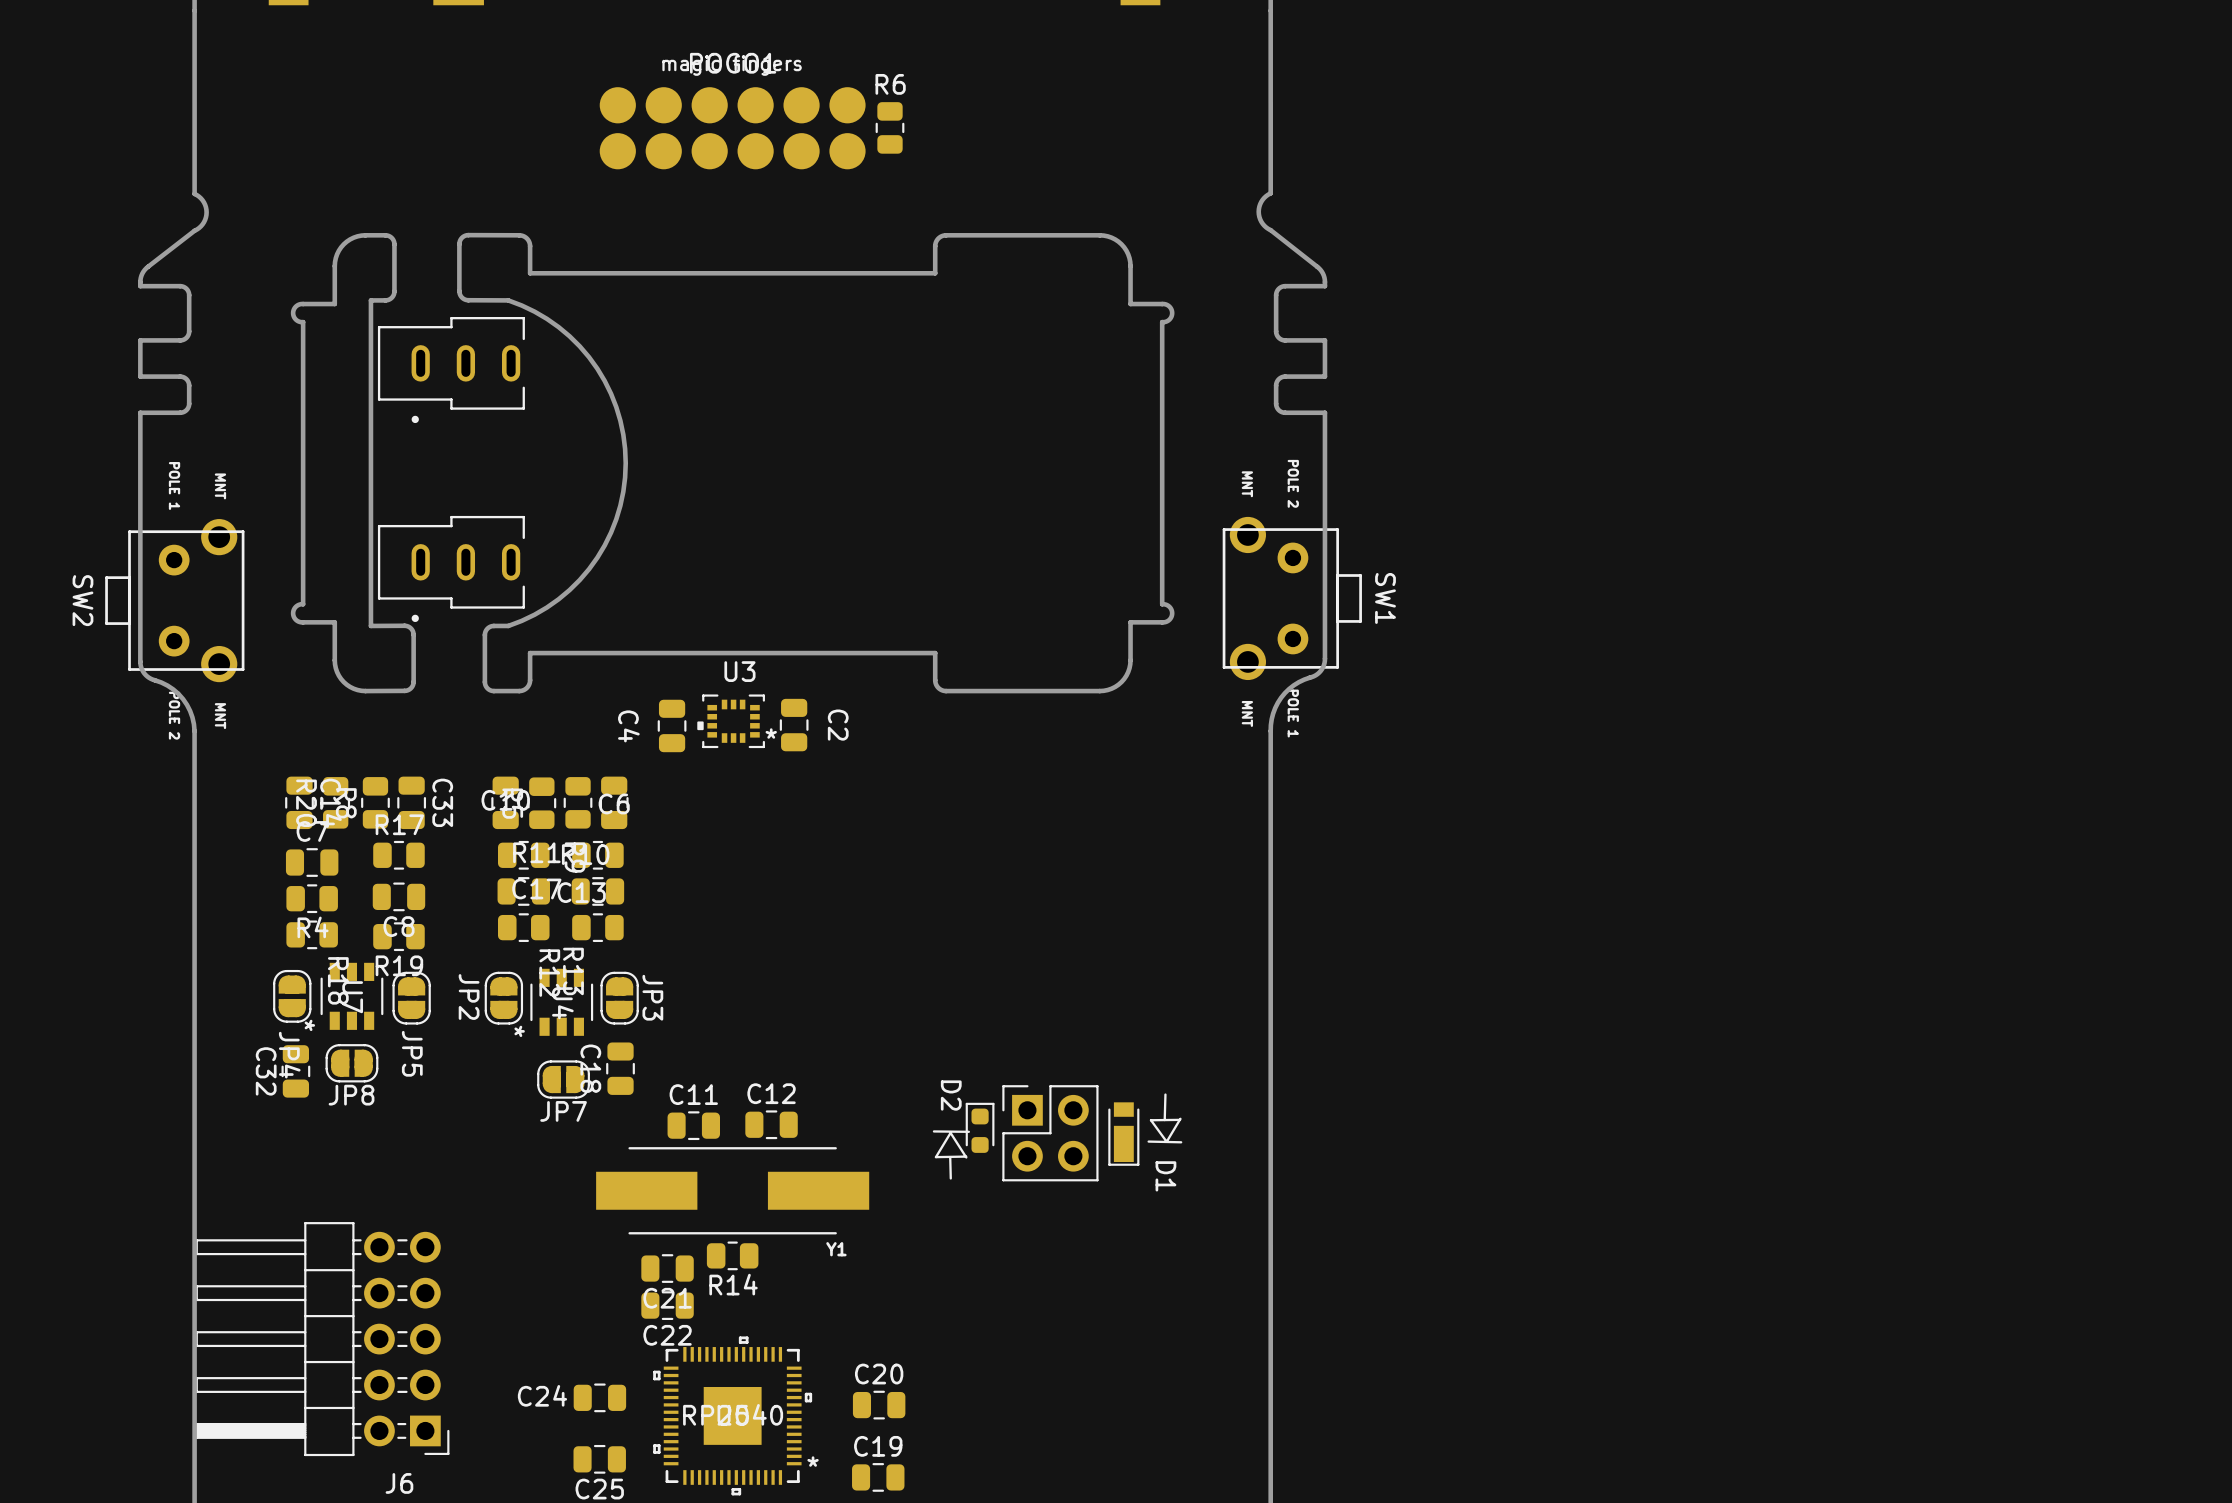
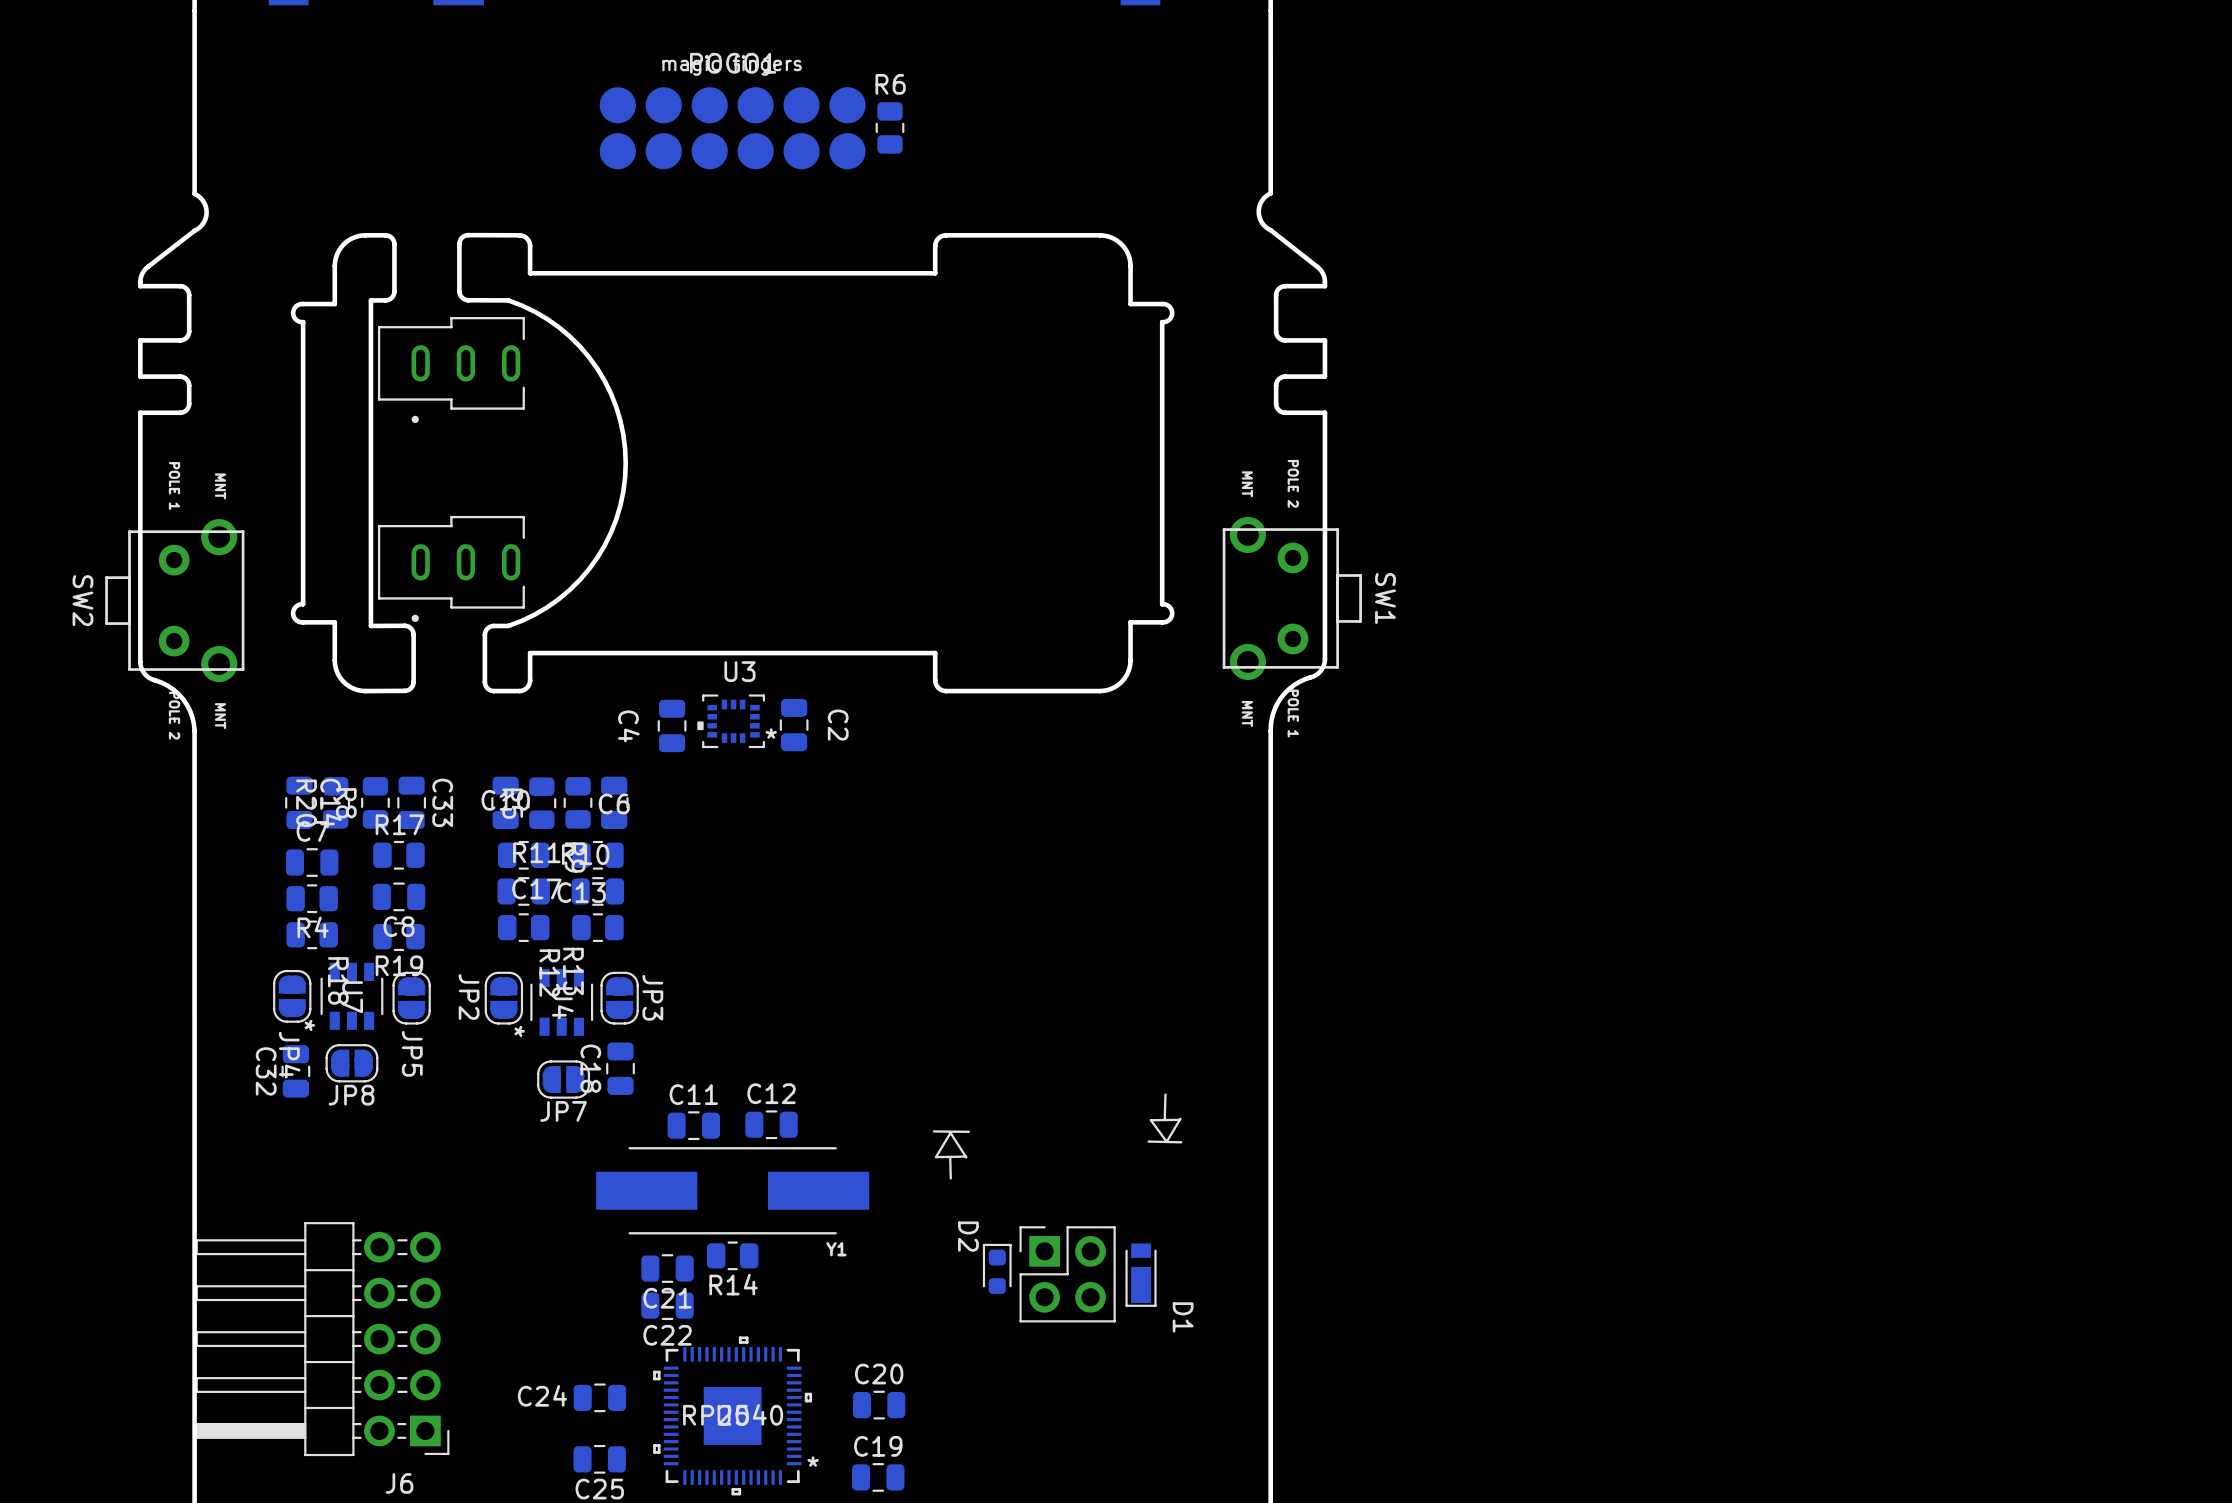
D2 position: (980, 1127) -> (997, 1268)
part position: (1050, 1133) -> (1067, 1274)
D1 position: (1123, 1134) -> (1141, 1275)

